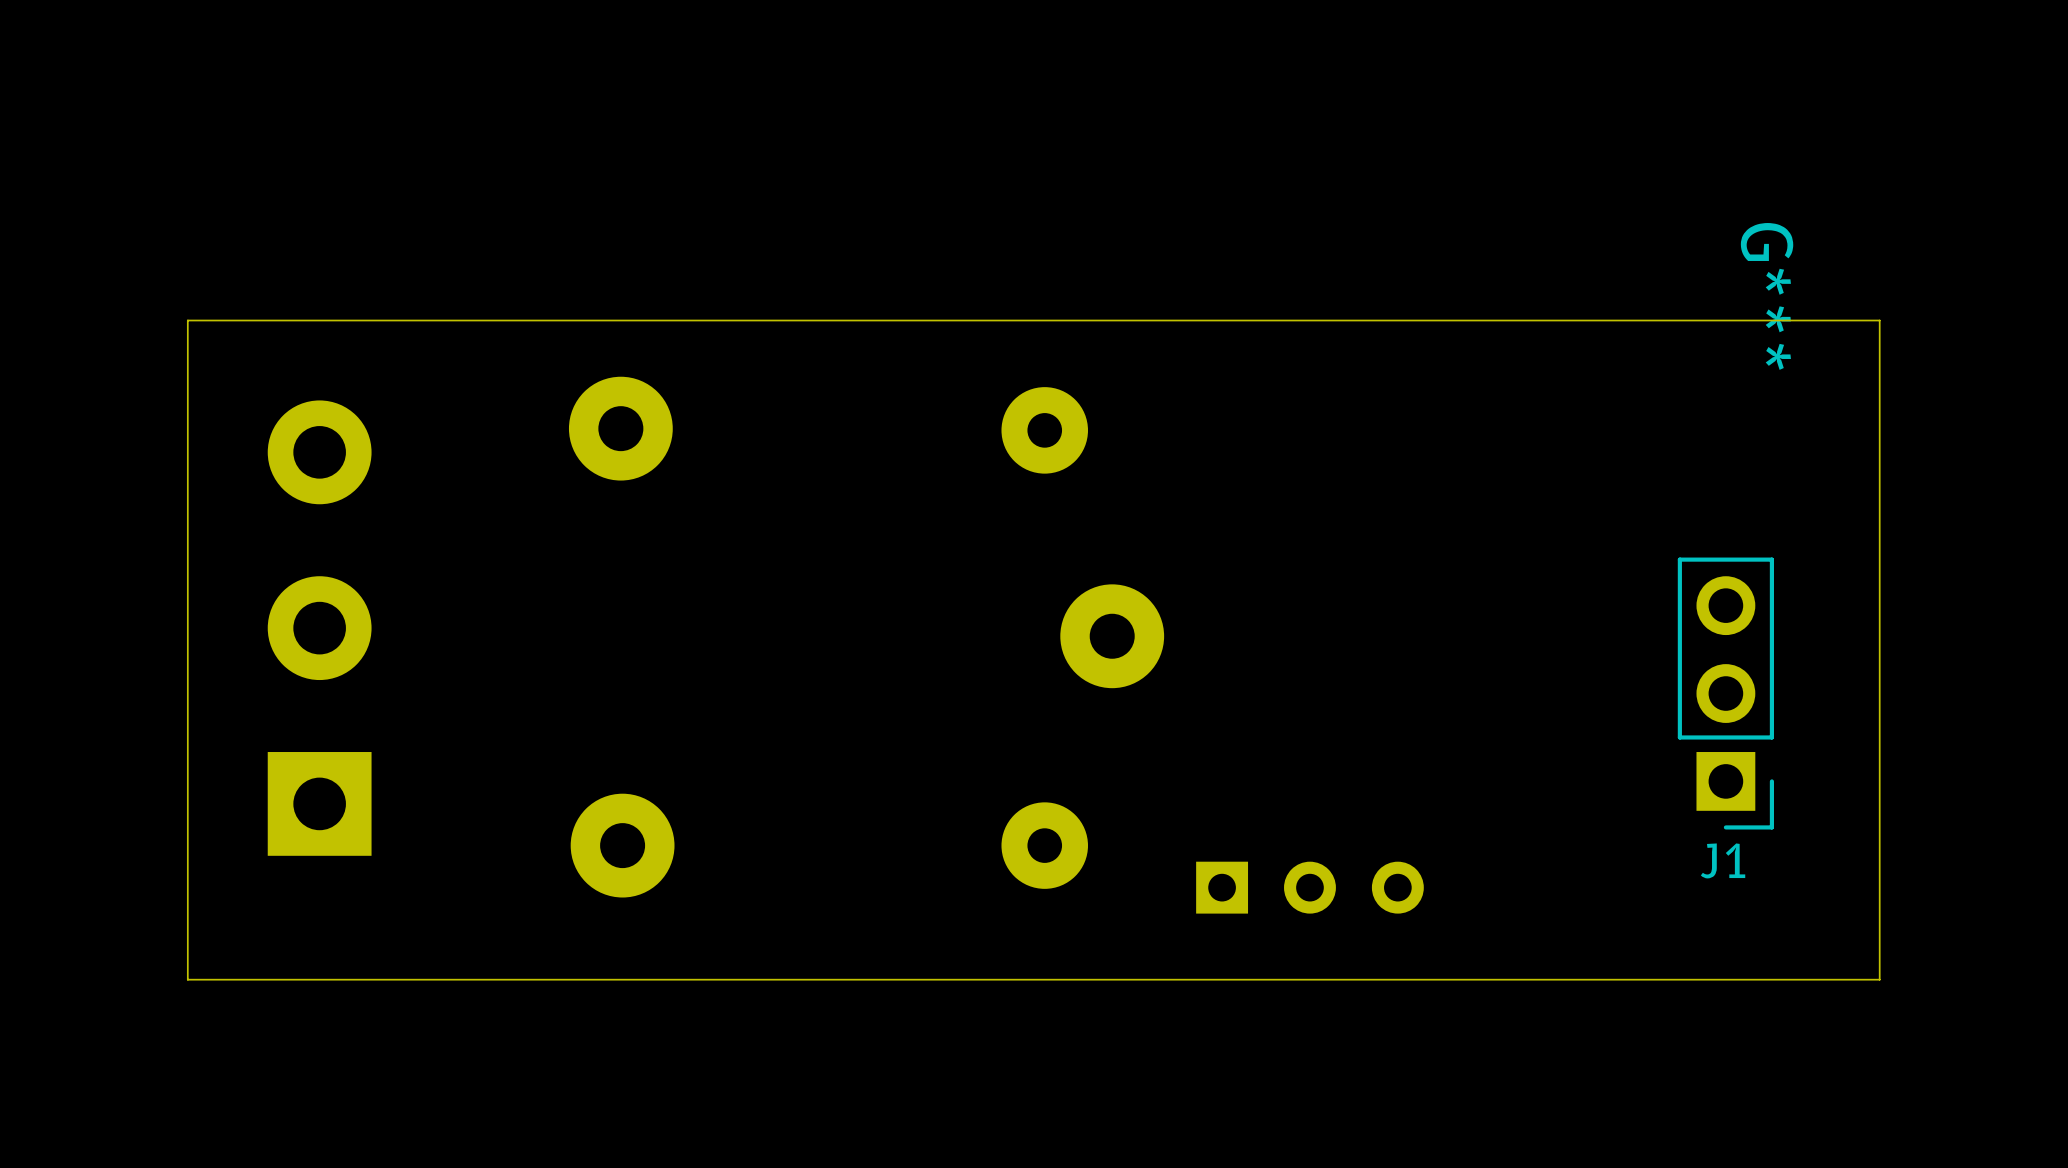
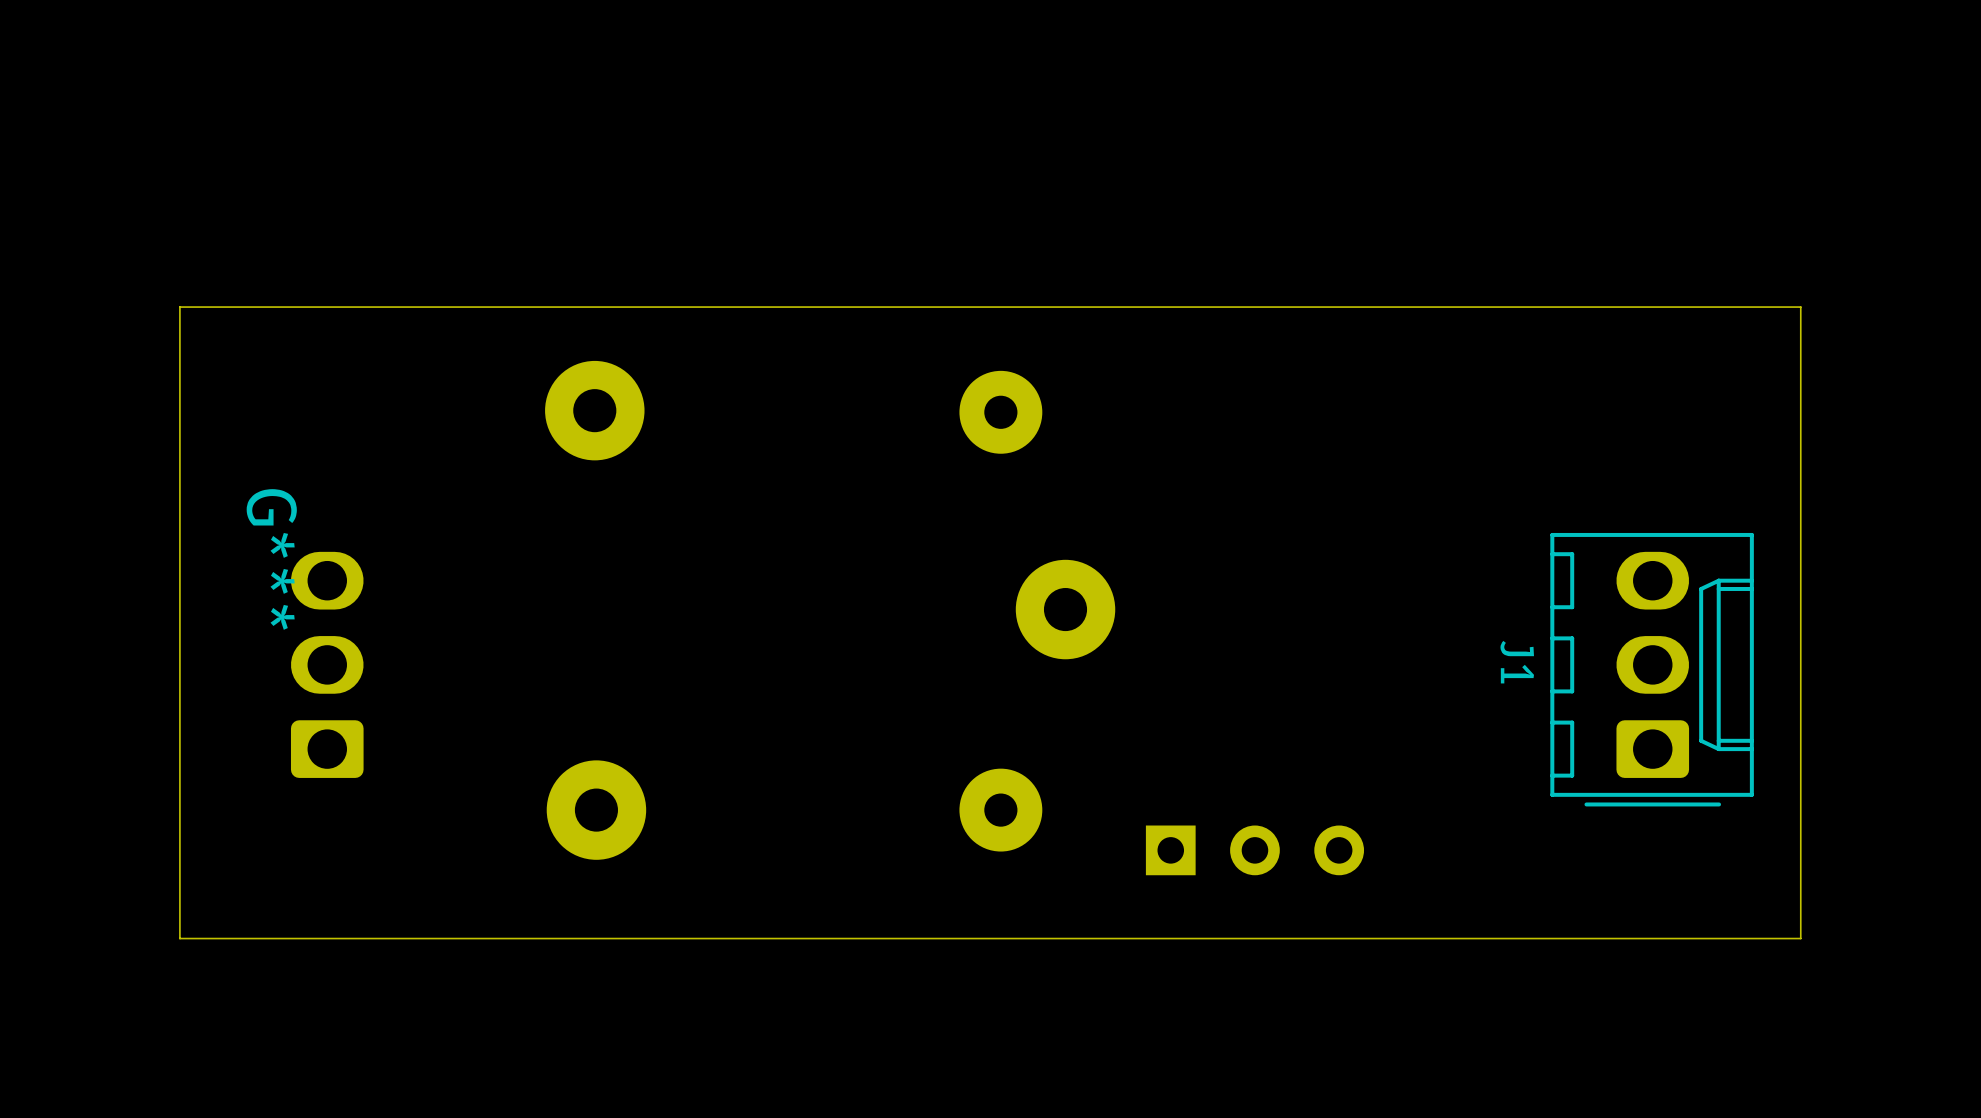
G***: (1767, 296) -> none
J1 footprint: [1677, 557, 1774, 830] -> [1550, 532, 1754, 807]
G***: none -> (271, 559)
part: (319, 628) -> none
part: none -> (327, 664)
J1 name position: J1 (1723, 860) -> J1 (1517, 662)

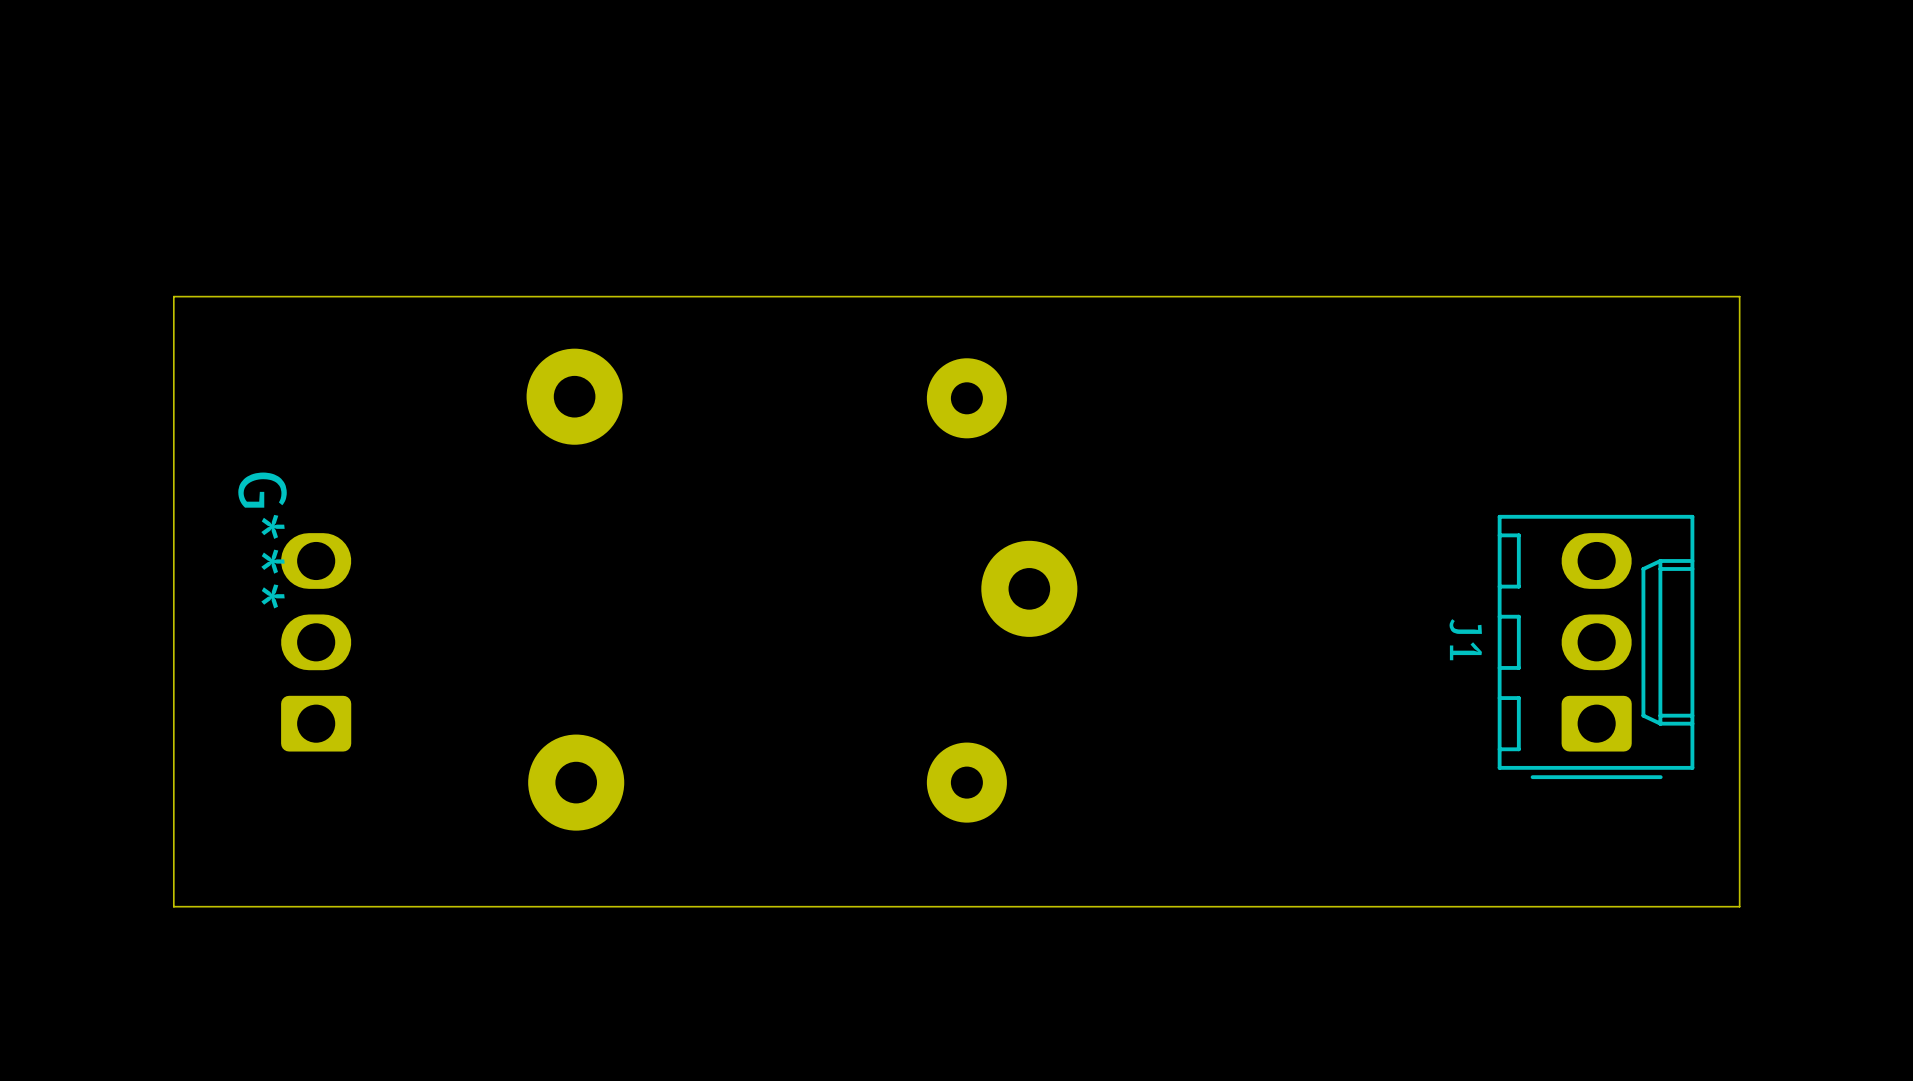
part: (1254, 850) -> none

